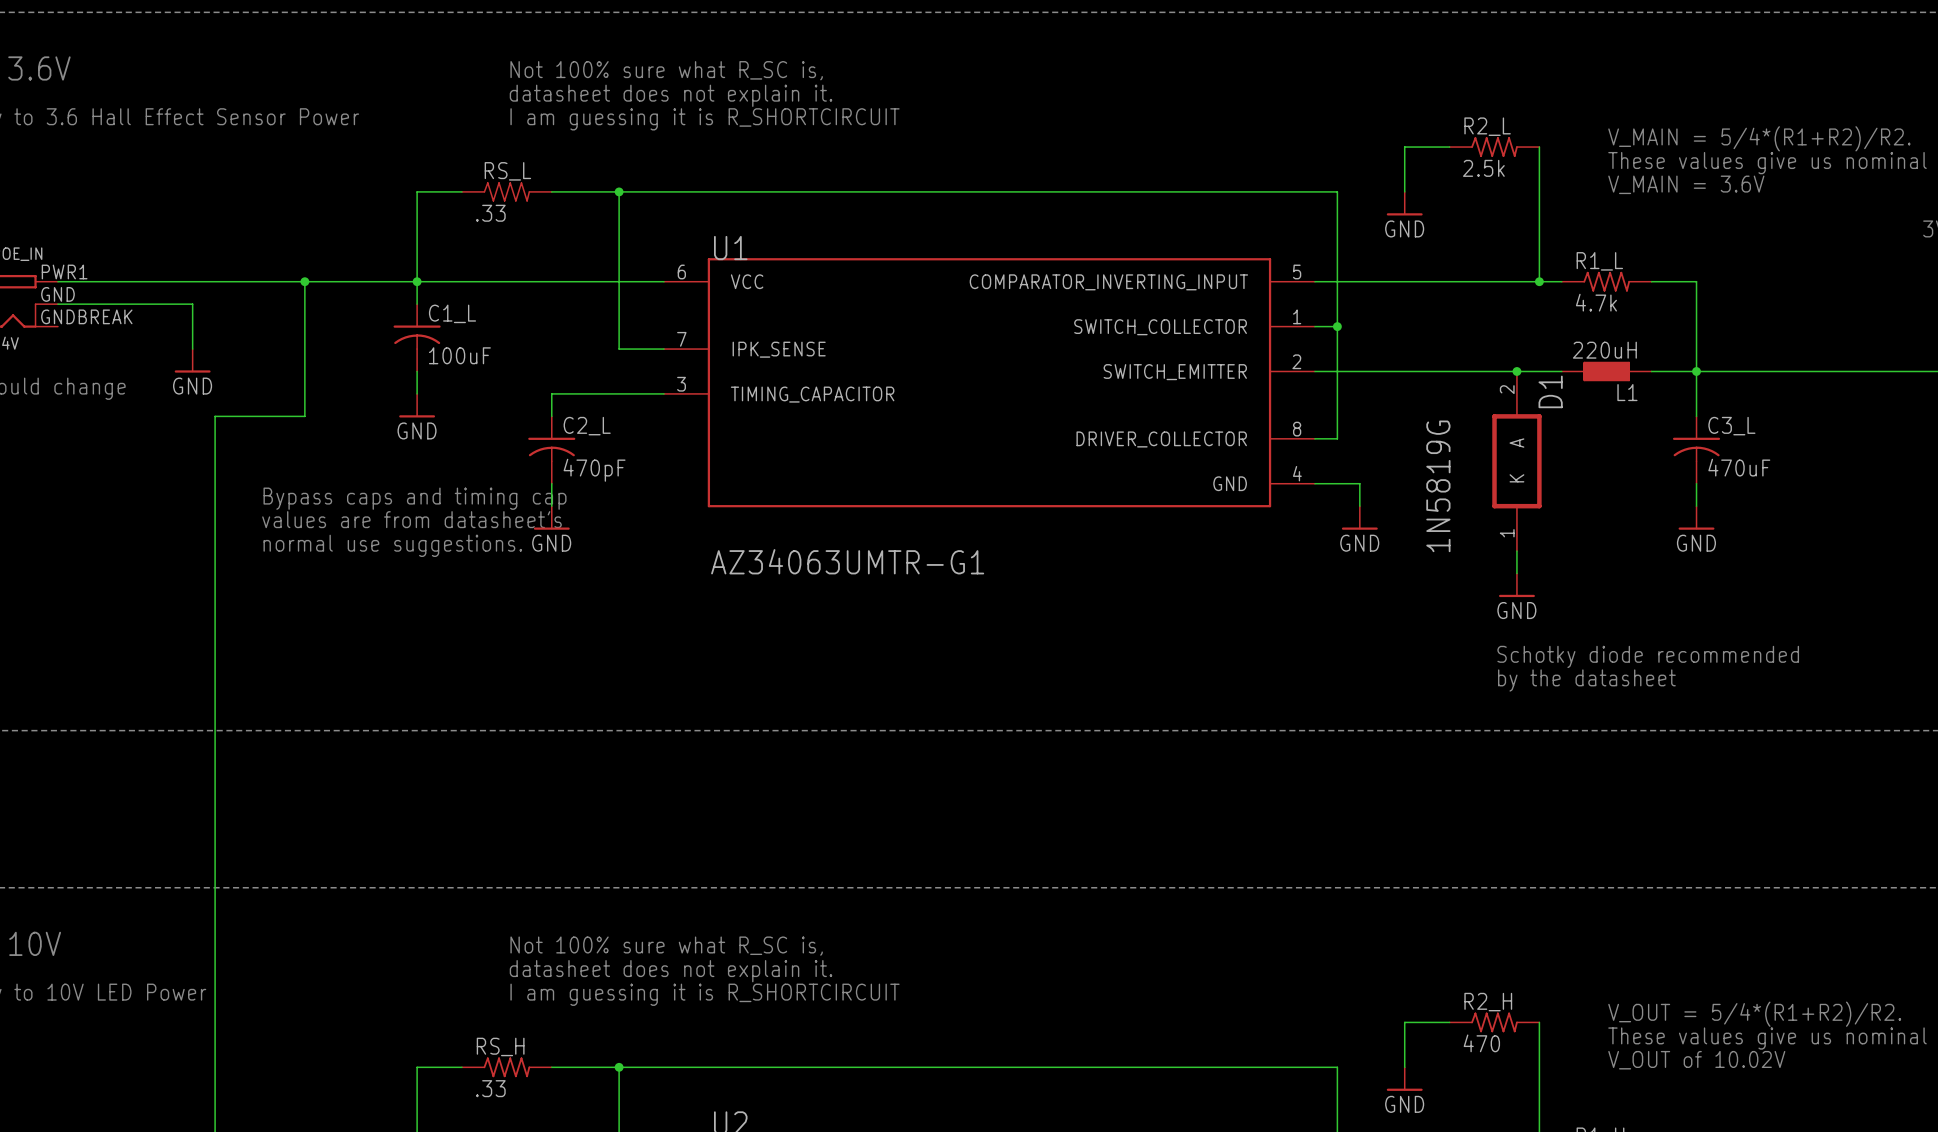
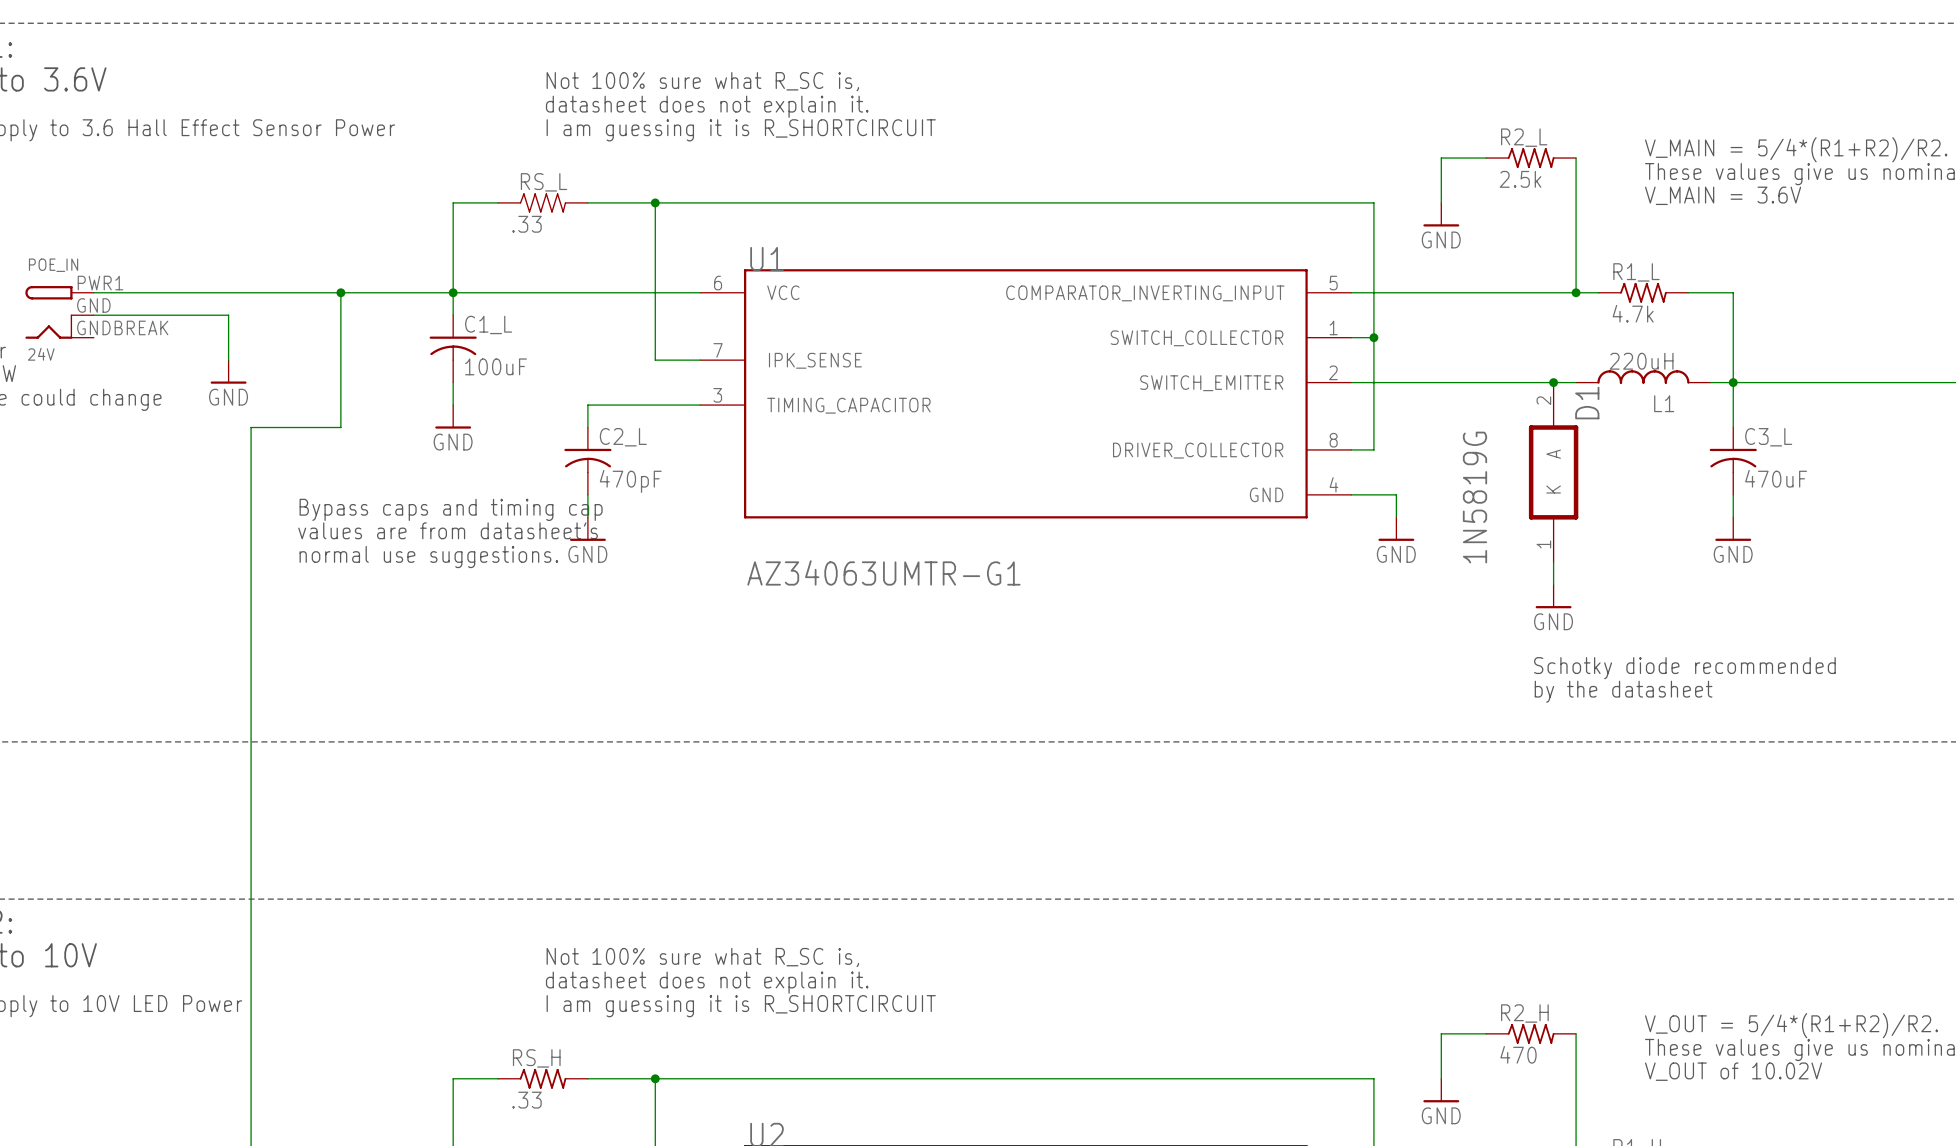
L1 symbol: [1561, 361, 1652, 382] -> [1576, 370, 1711, 384]

